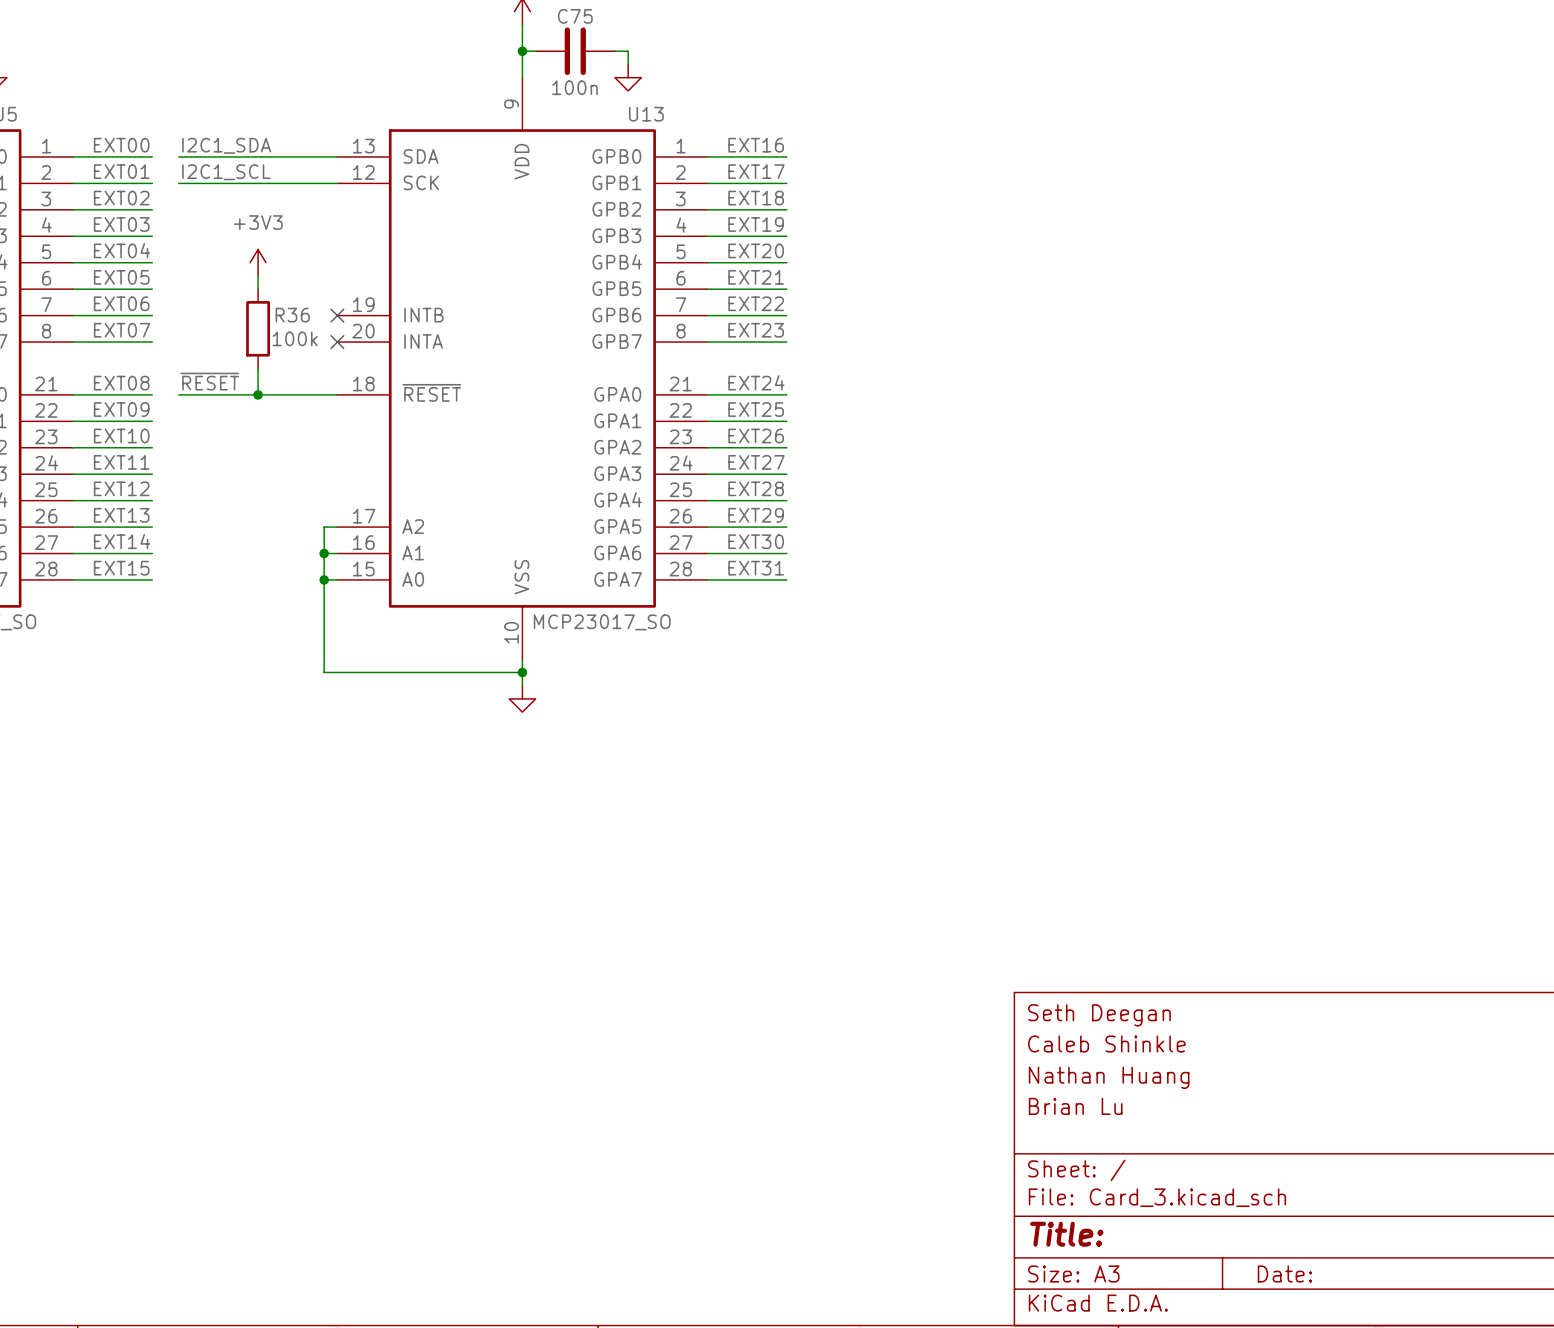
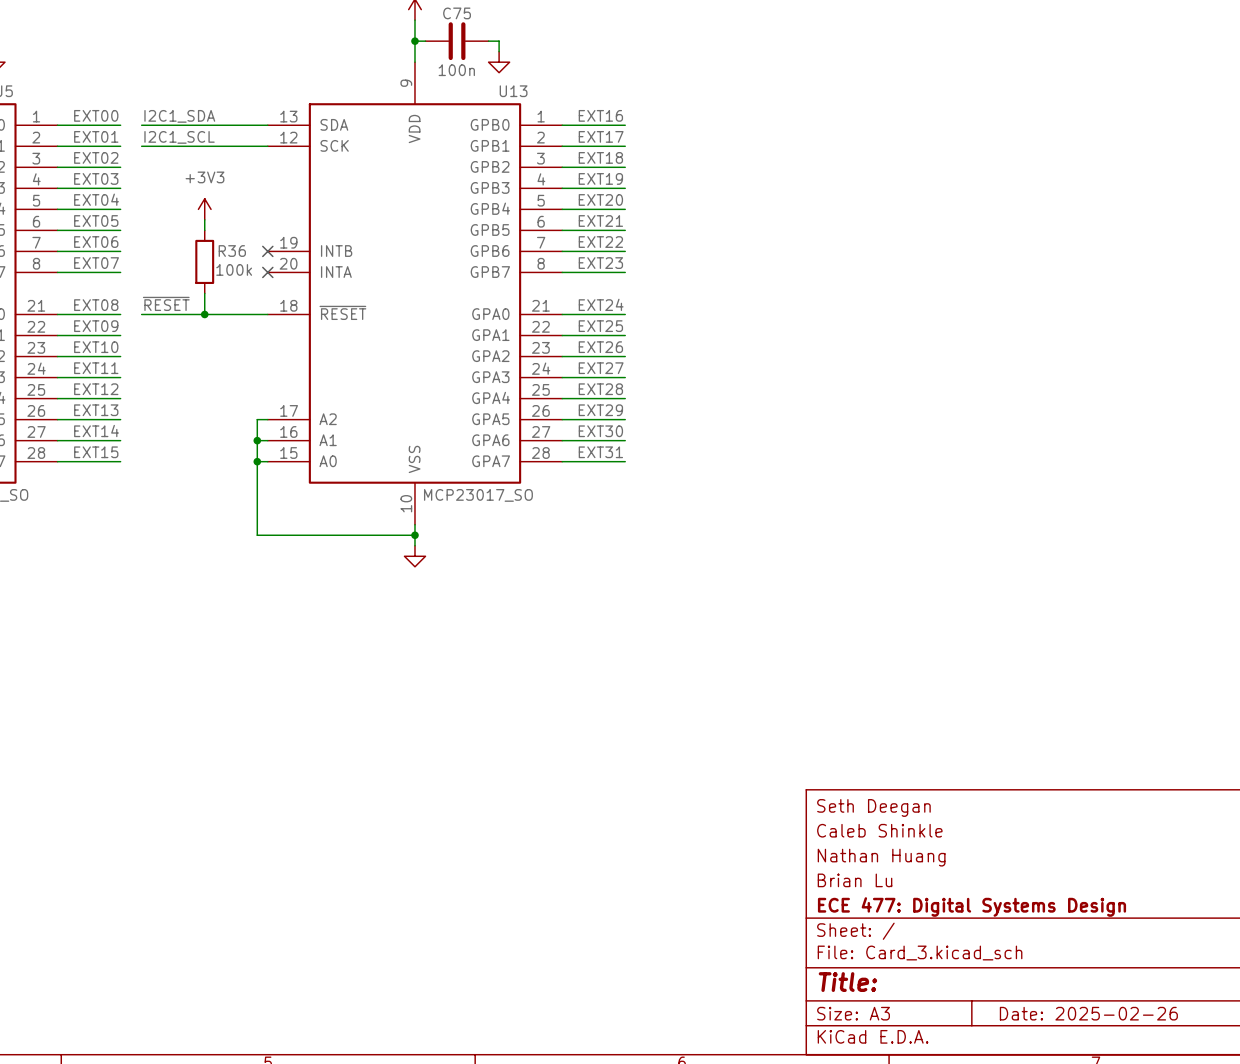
title block: none -> ECE 477: Digital Systems Design (972, 907)
title block: Date: (1284, 1273) -> Date: 2025-02-26 (1088, 1013)

